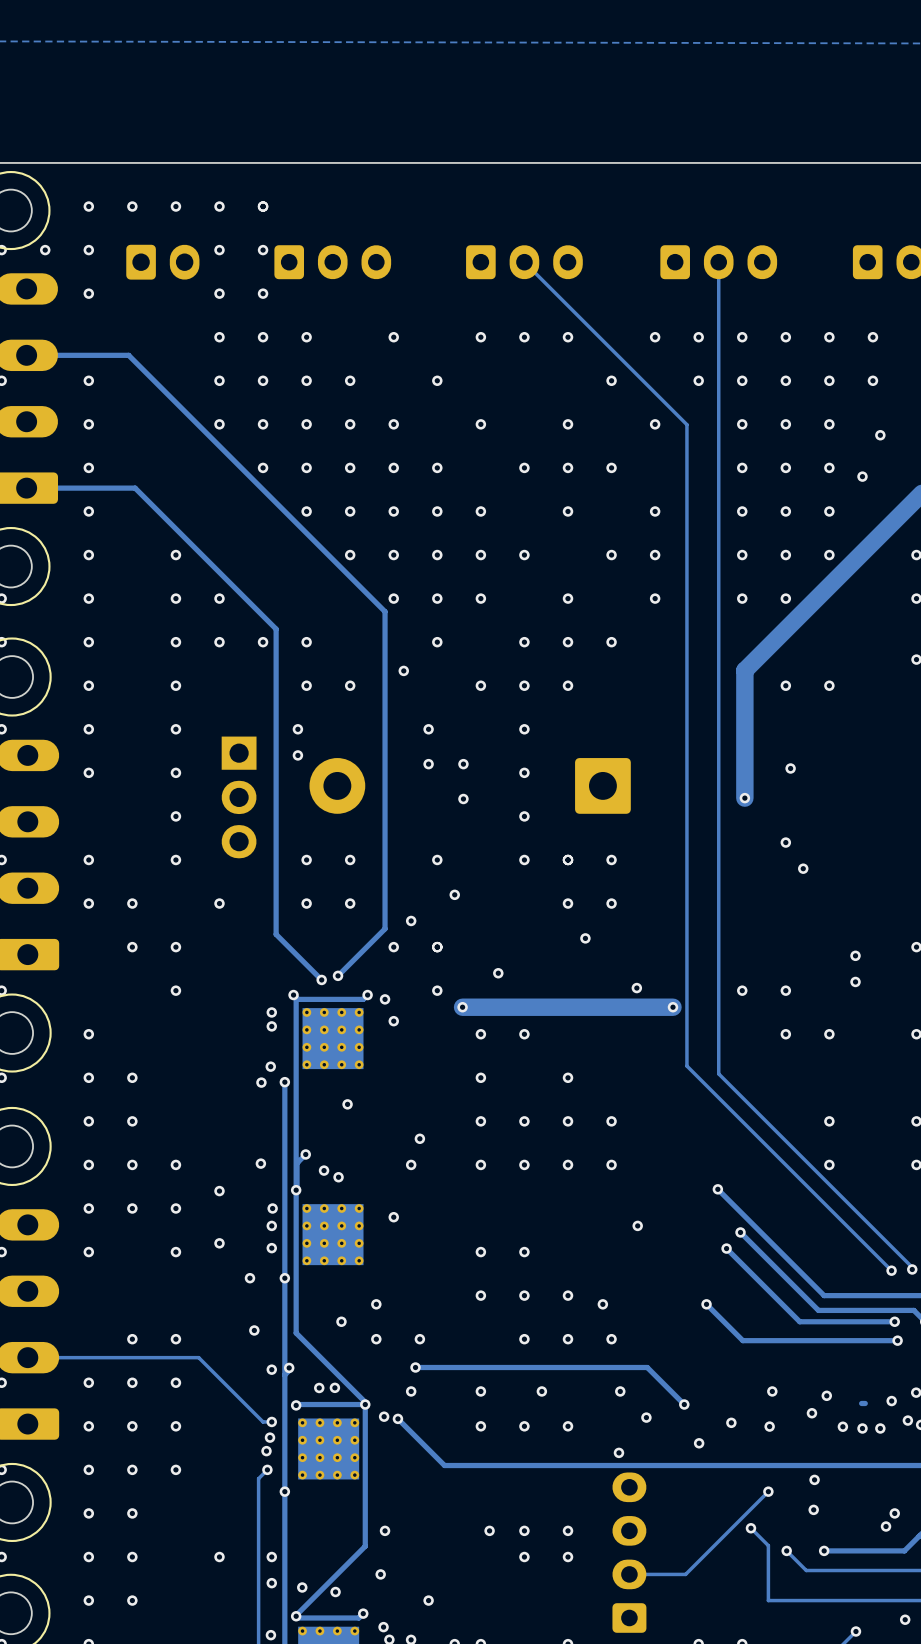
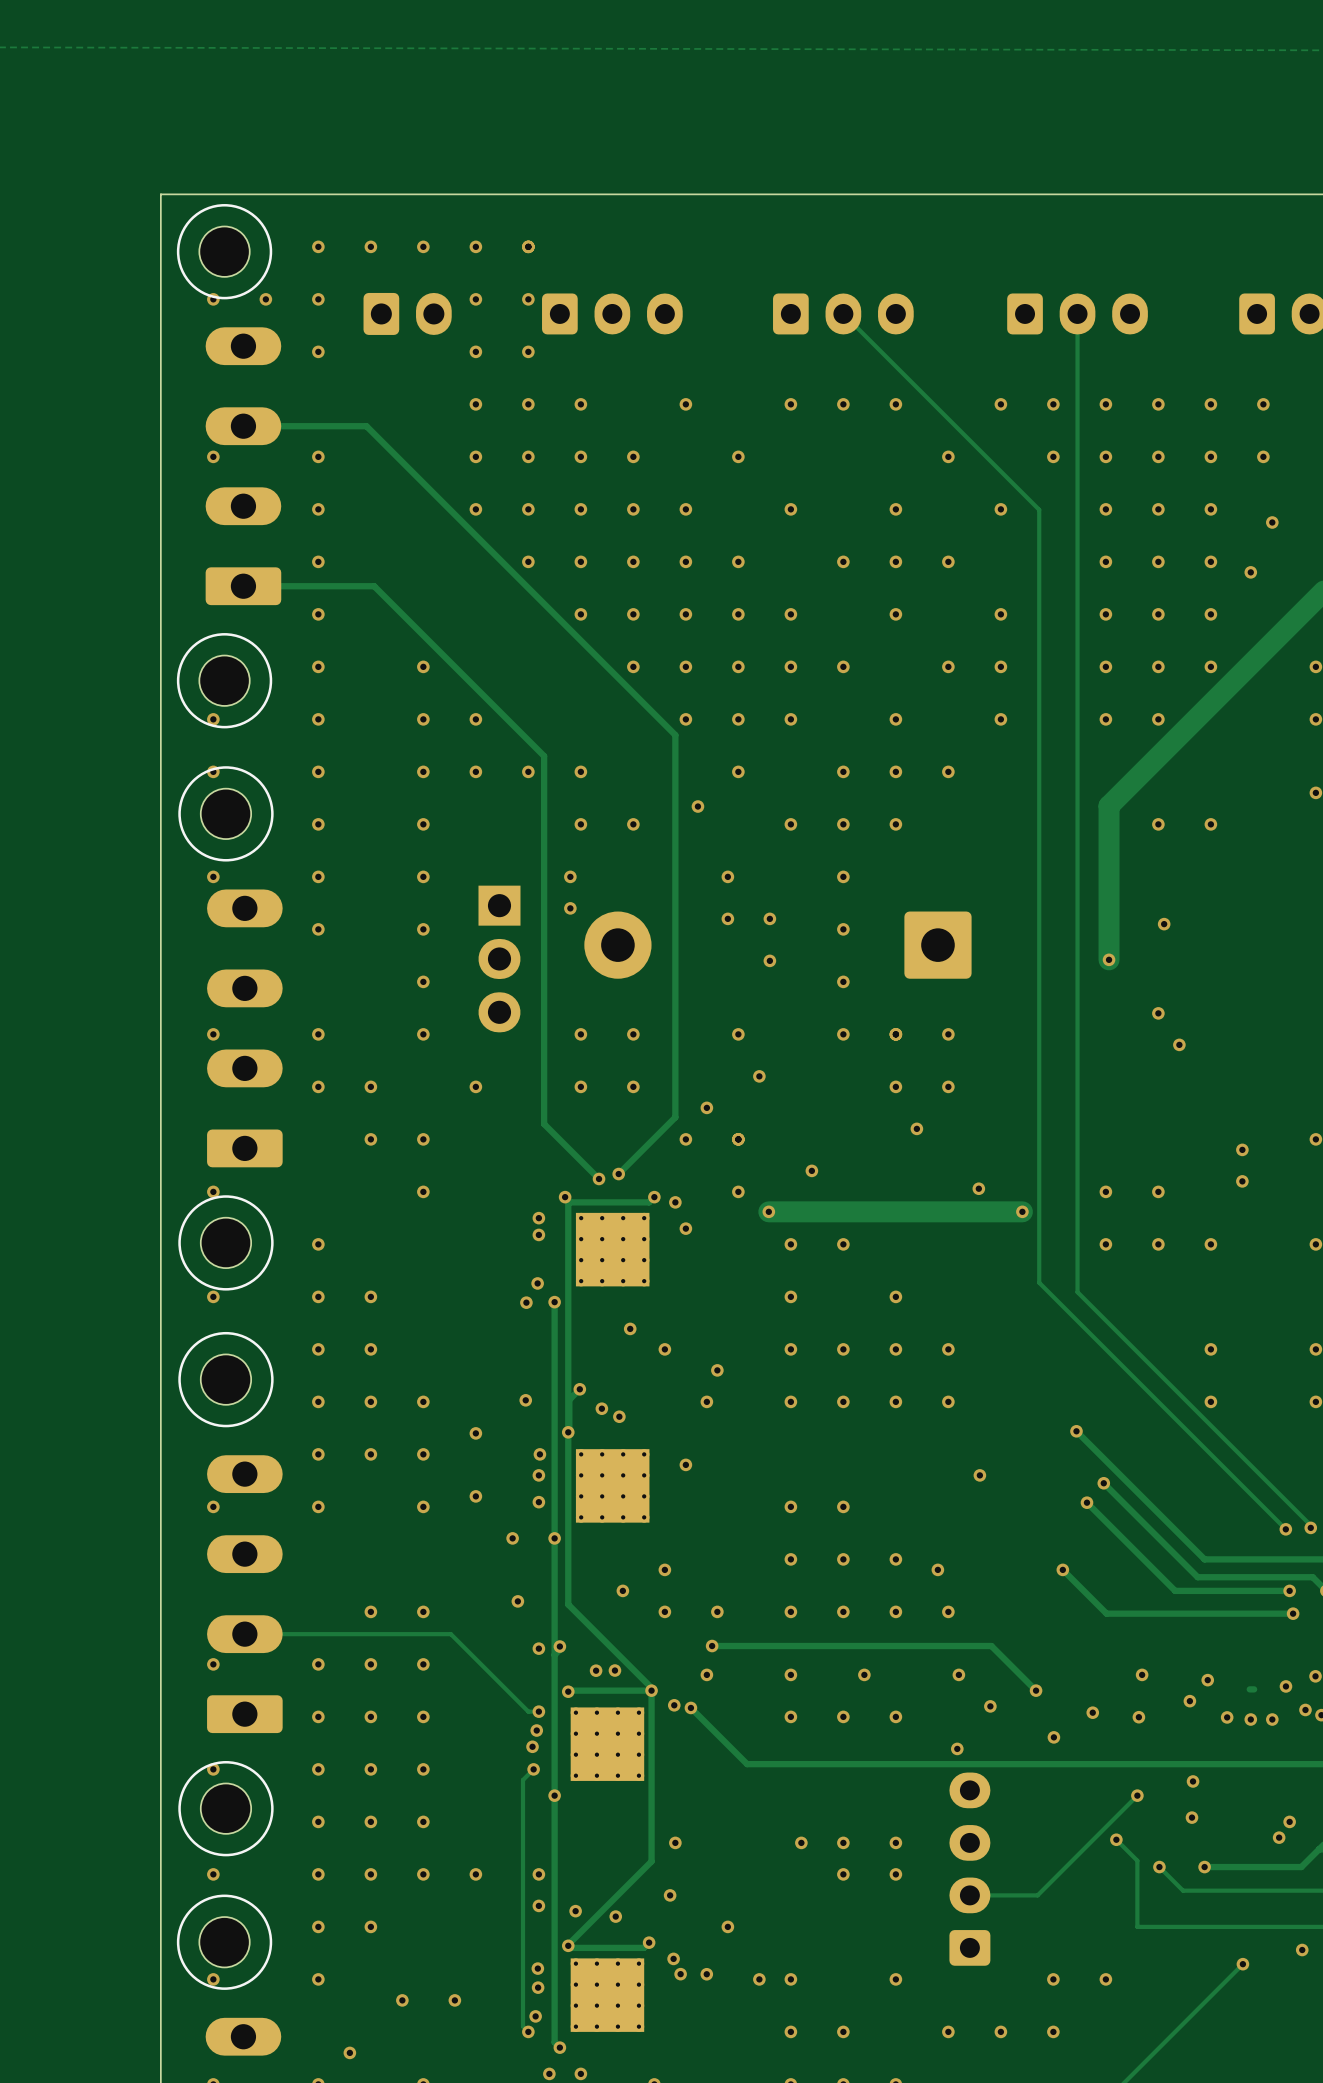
via: none -> (1105, 1244)
via: none -> (664, 1349)
via: none -> (790, 1611)
via: none -> (423, 1821)
via: none -> (423, 1874)

